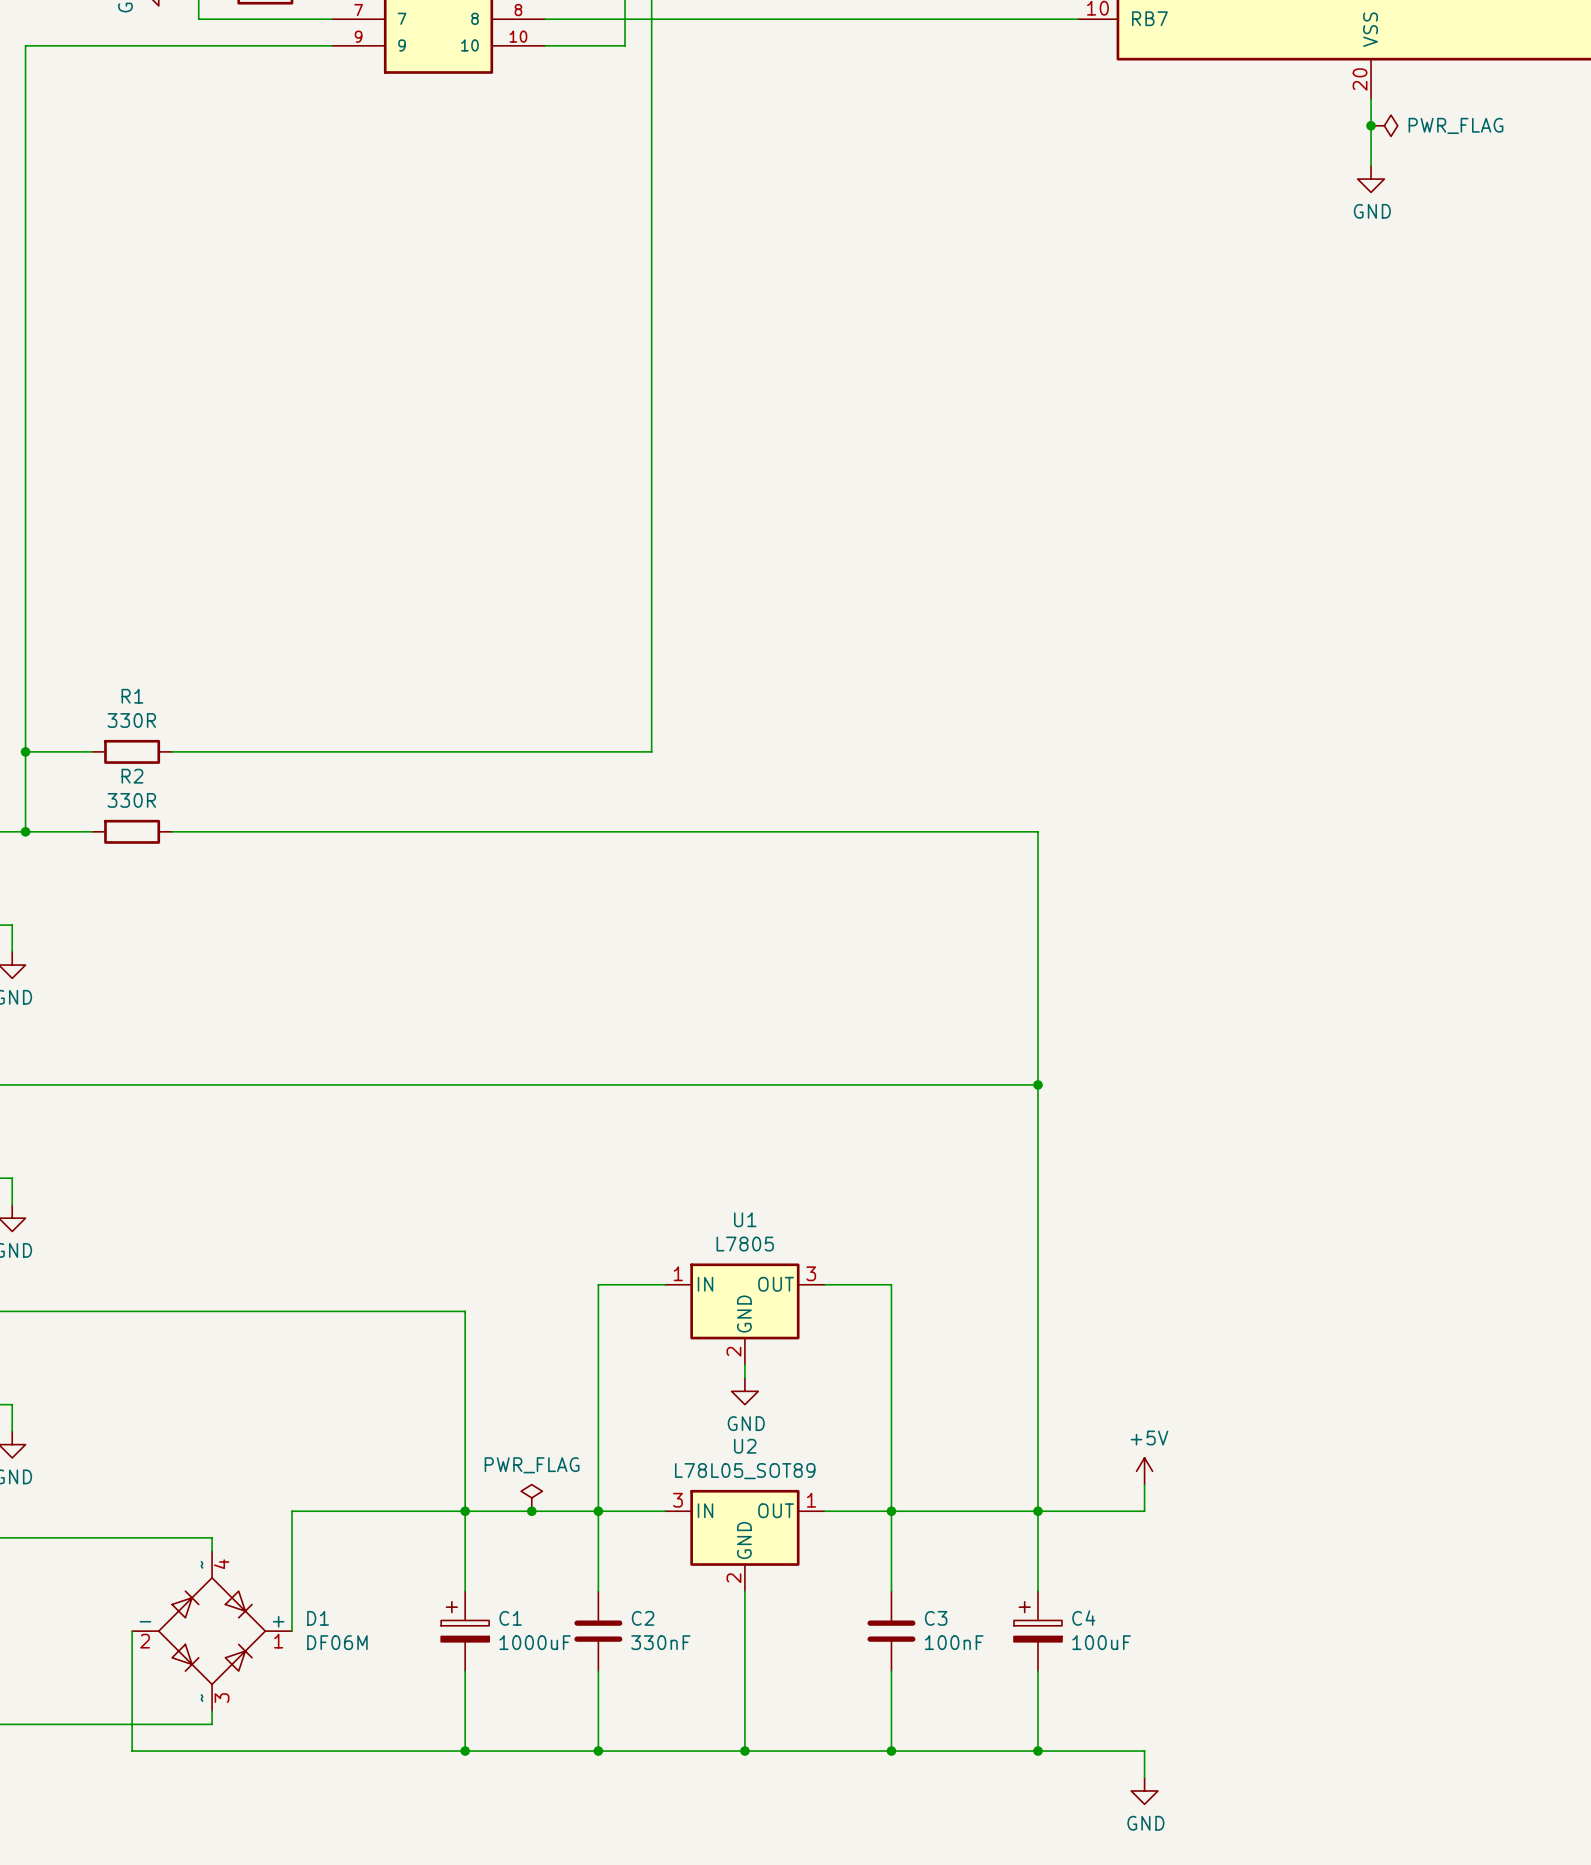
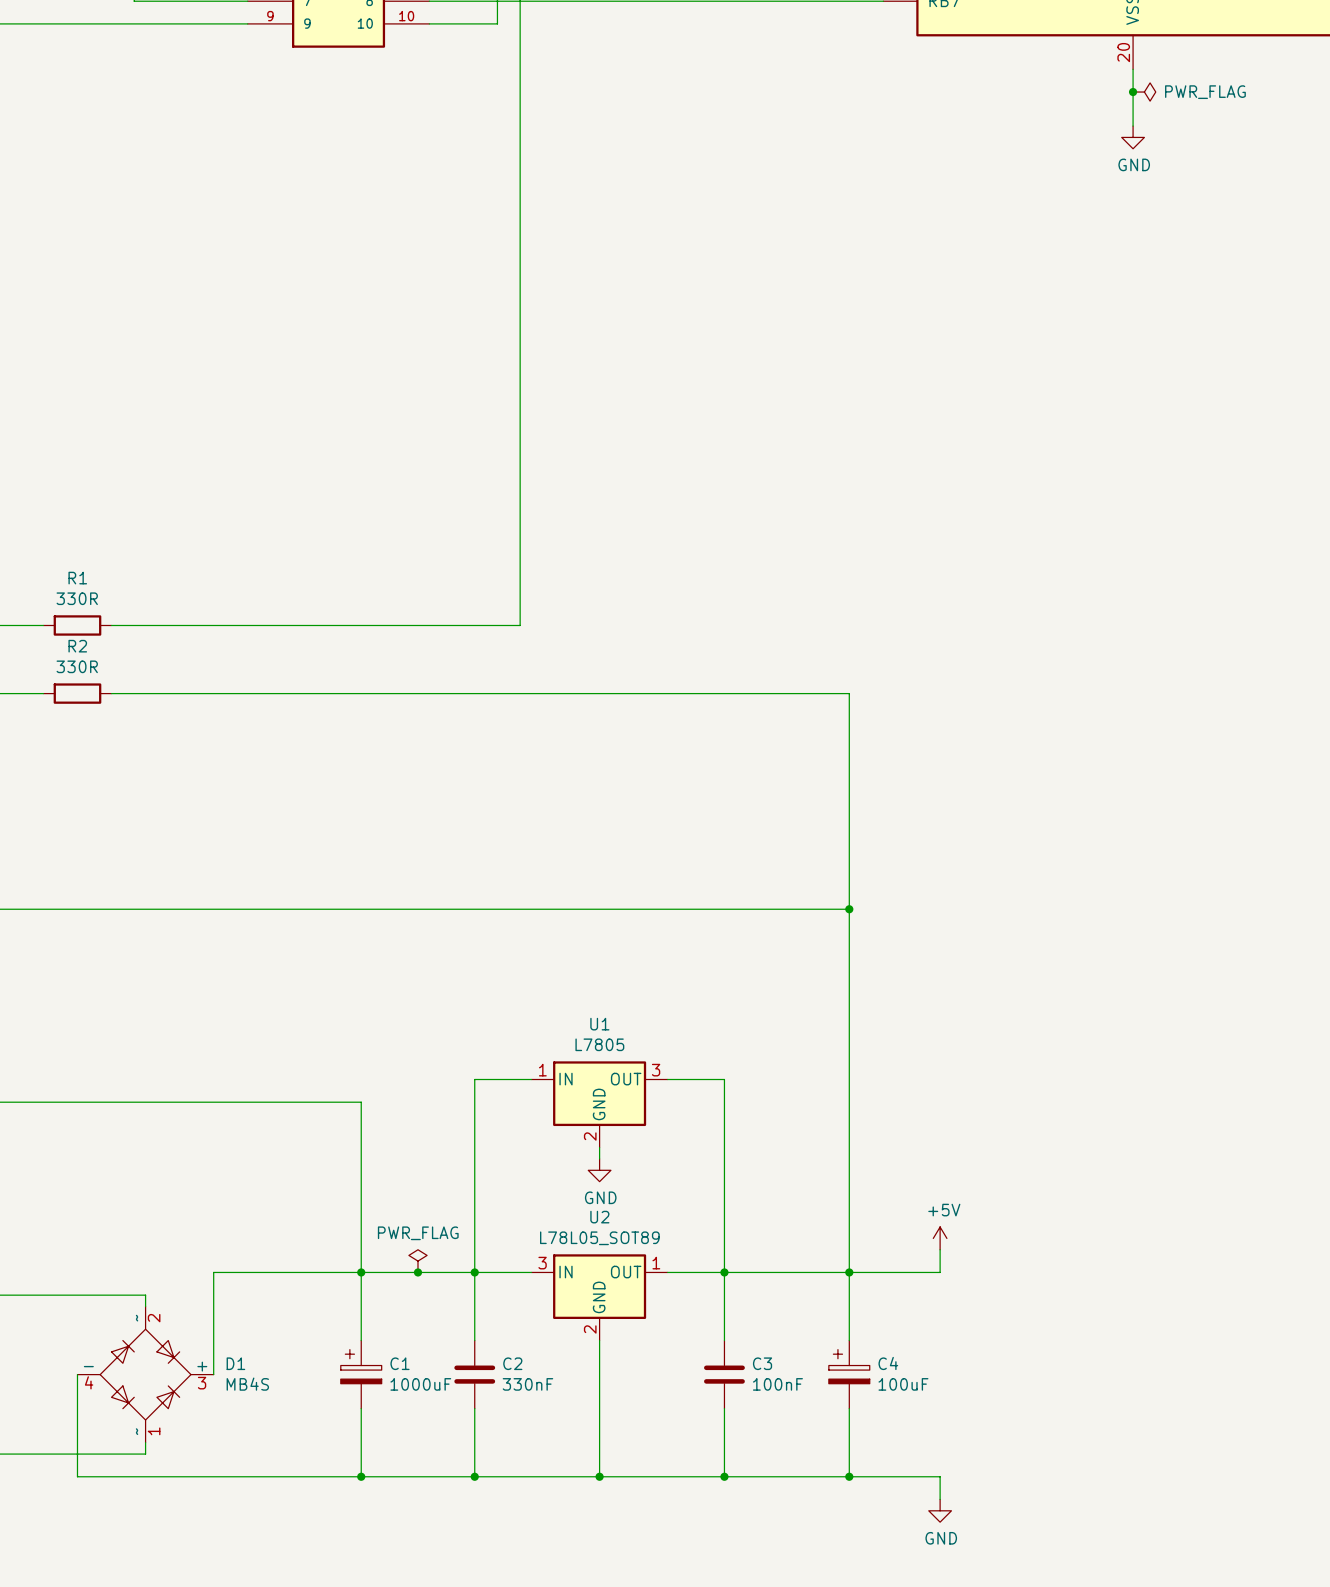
D1 pin number: 4 (221, 1564) -> 2 (154, 1318)
D1 pin number: 2 (145, 1641) -> 4 (89, 1382)
D1 pin number: 1 (278, 1641) -> 3 (202, 1383)
D1 value: DF06M (337, 1642) -> MB4S (247, 1384)
D1 pin number: 3 (222, 1698) -> 1 (154, 1431)

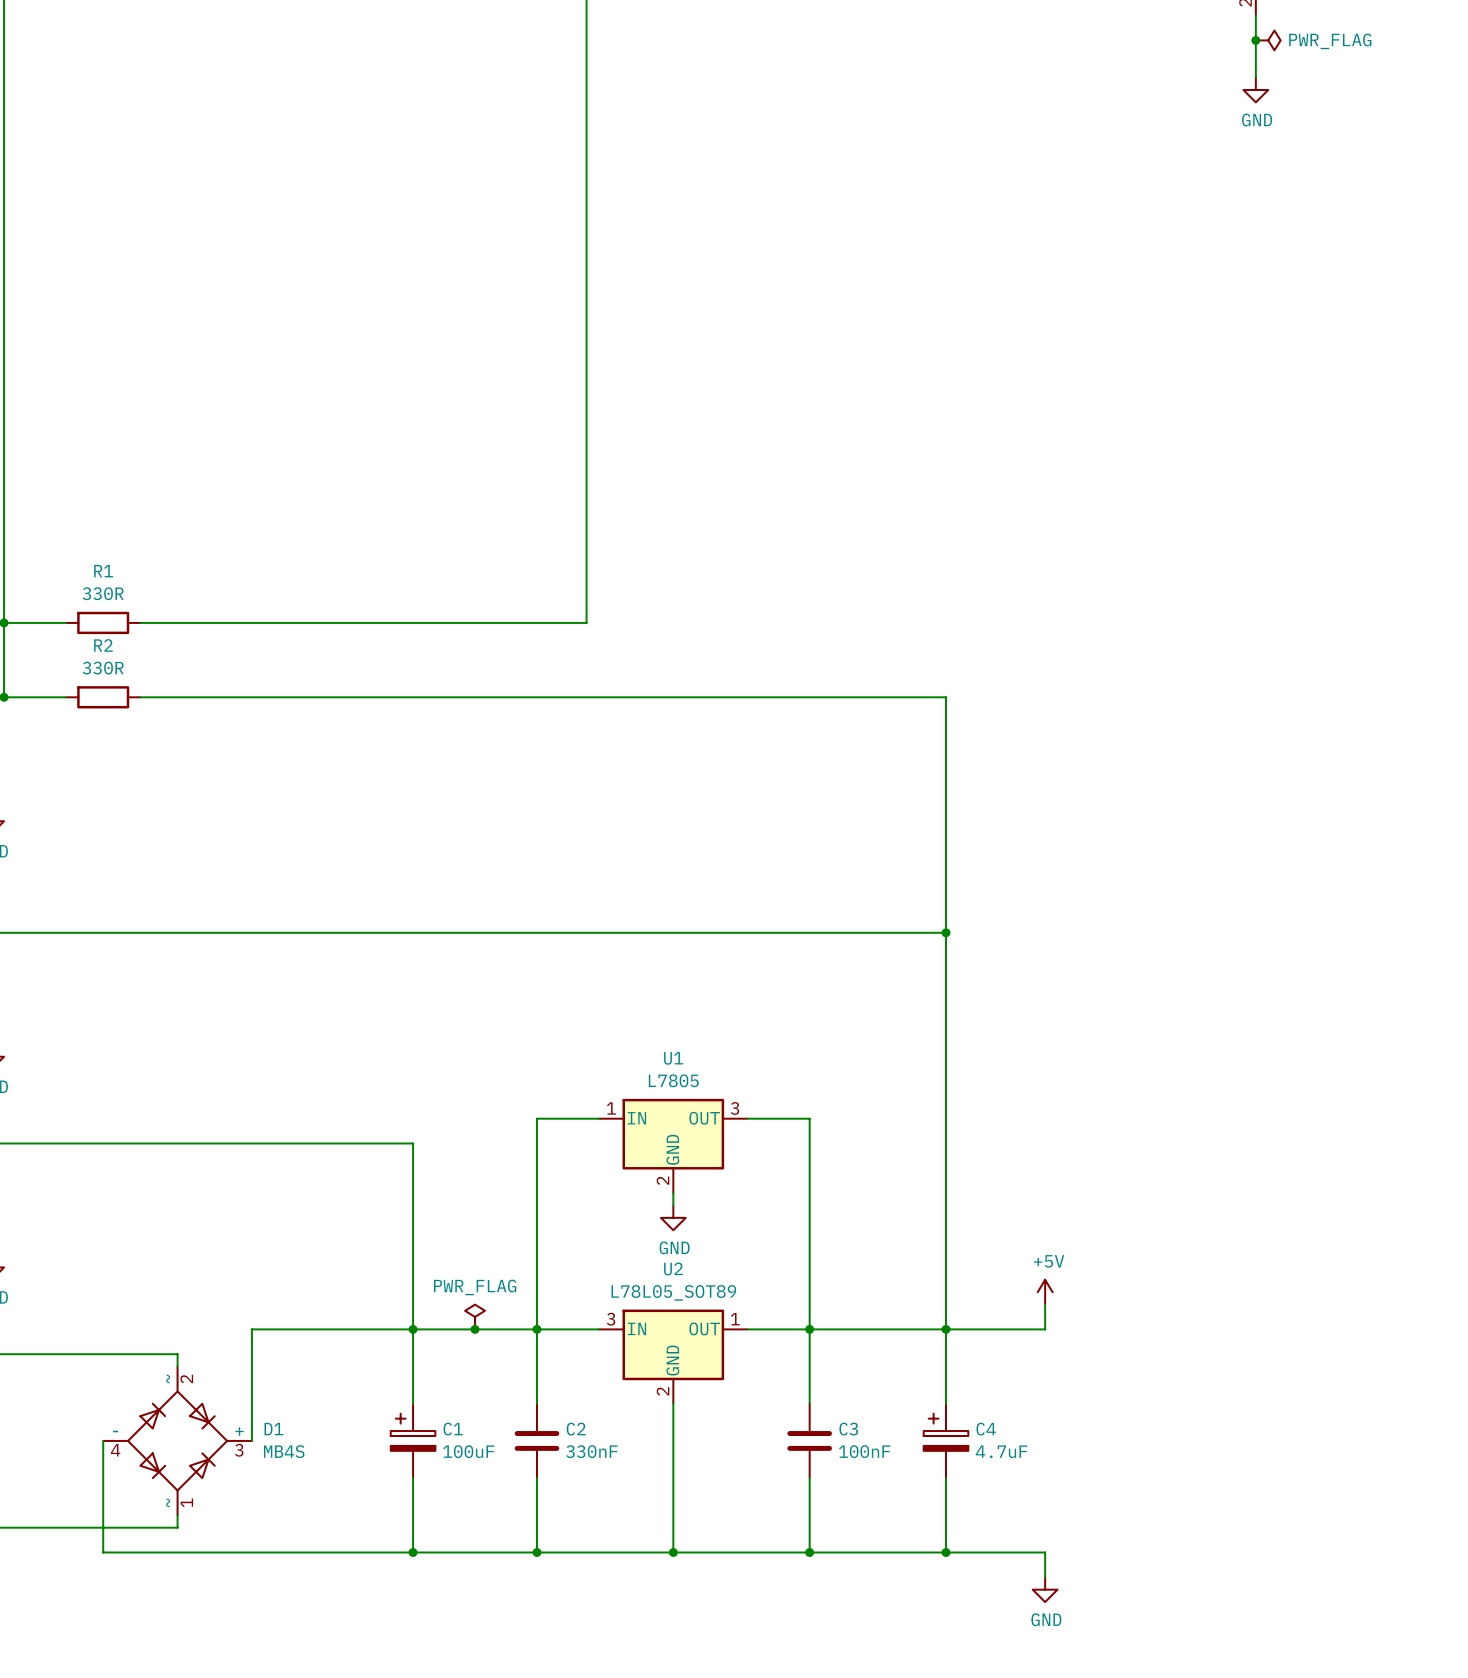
C1 value: 1000uF (420, 1384) -> 100uF (468, 1451)
C4 value: 100uF (903, 1384) -> 4.7uF (1001, 1451)

